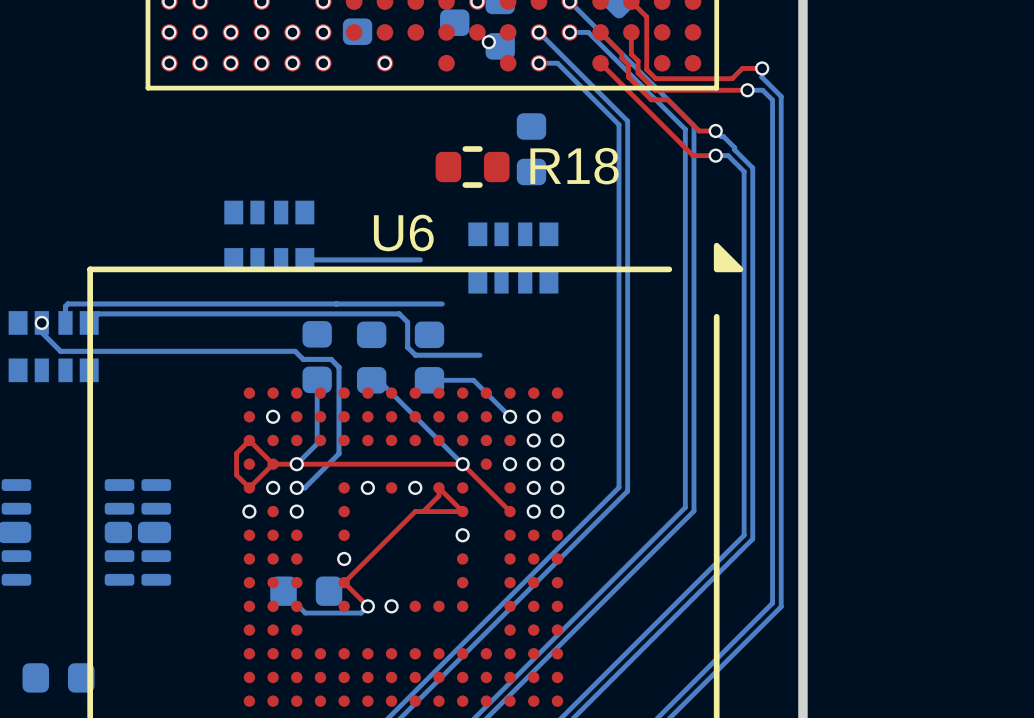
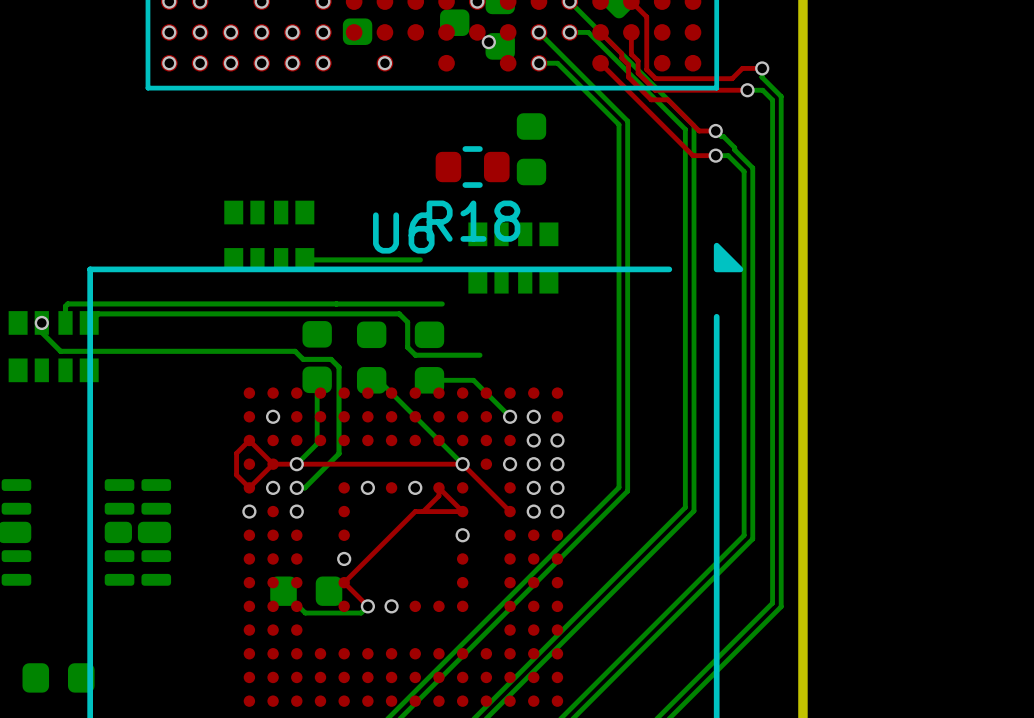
R18 name position: R18 (574, 166) -> R18 (473, 221)

